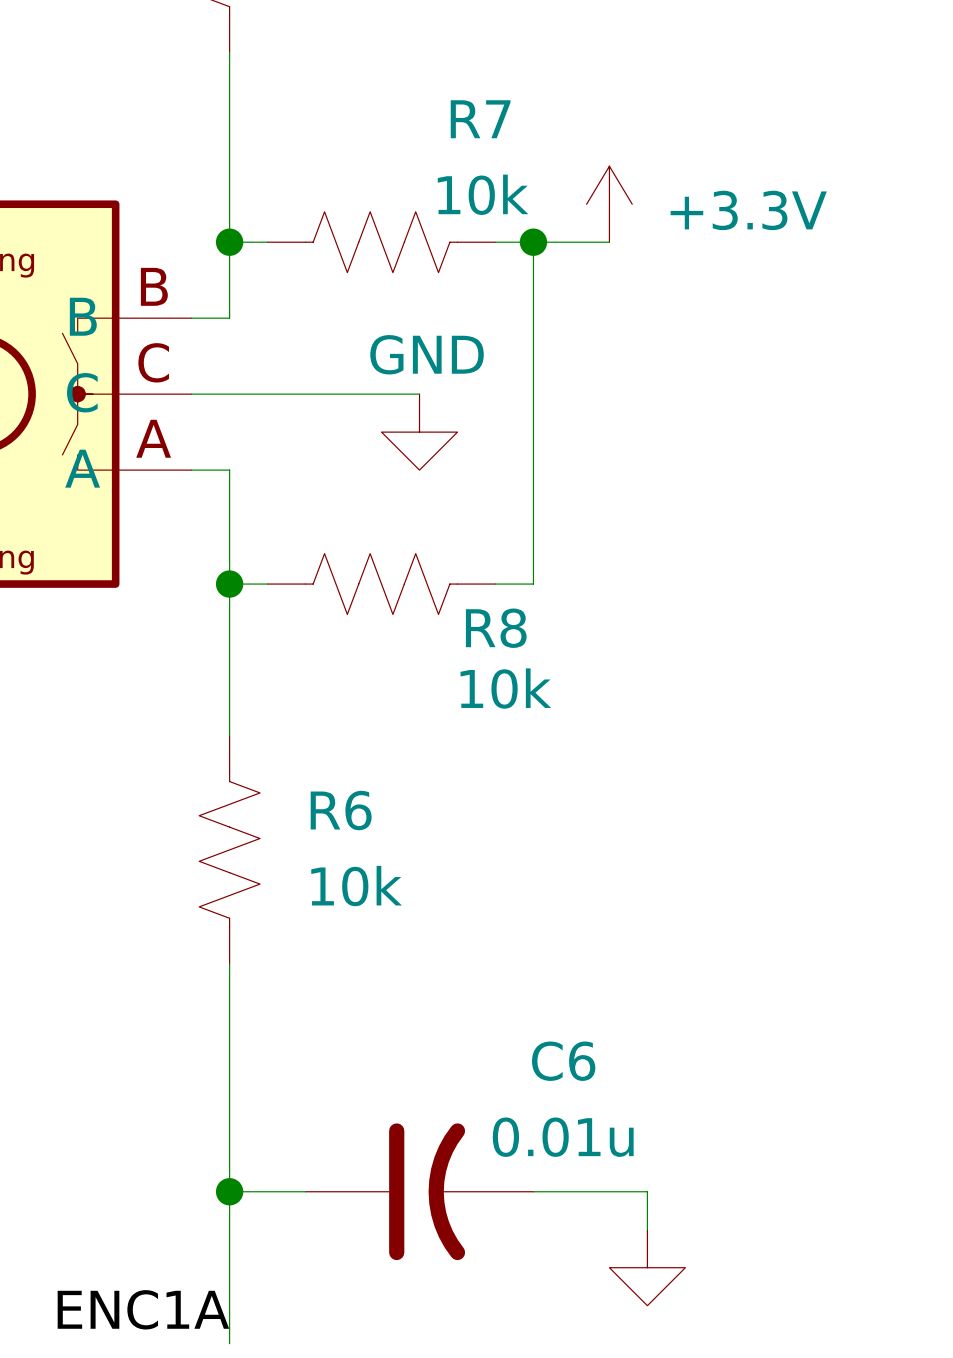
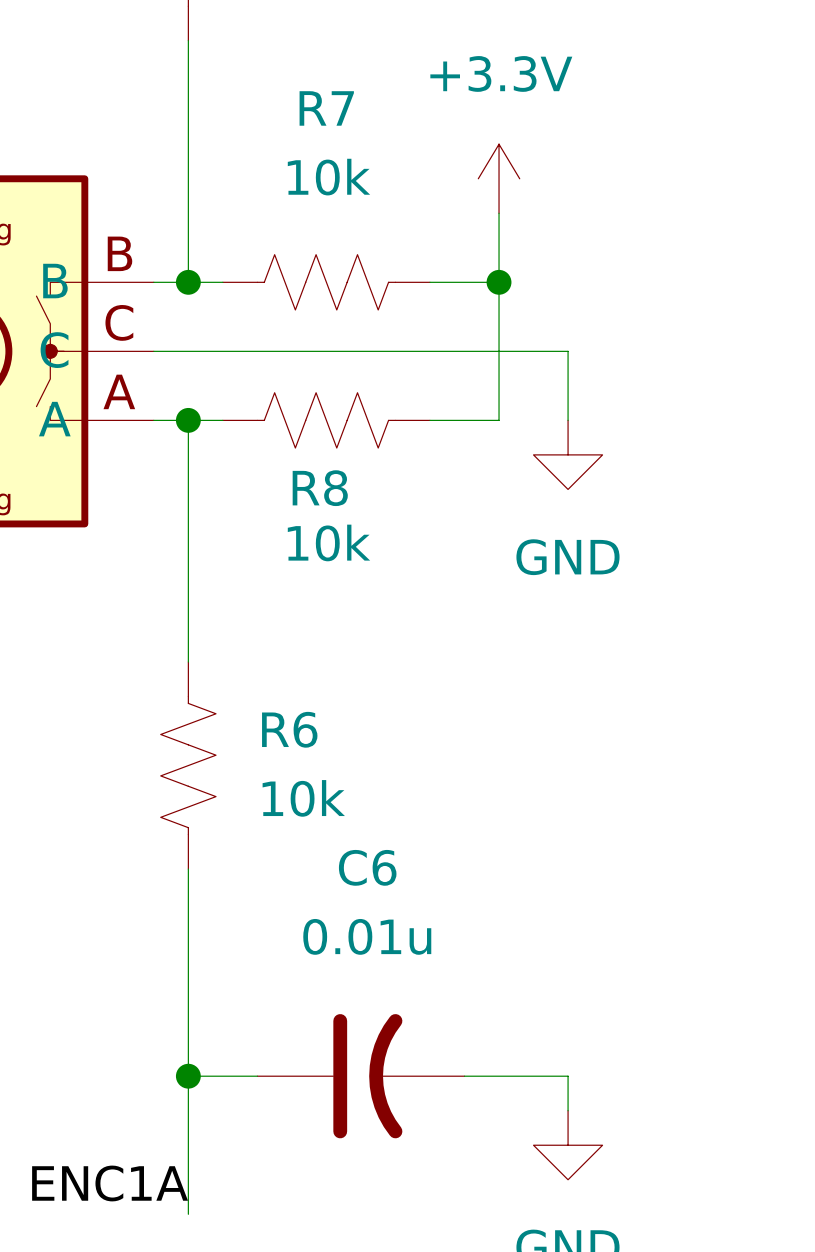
R7 name position: R7 (480, 119) -> R7 (326, 108)
R7 value position: 10k (483, 194) -> 10k (328, 177)
power symbol position: +3.3V (609, 204) -> +3.3V (499, 178)
power symbol text position: +3.3V (748, 210) -> +3.3V (501, 73)
wire: (229, 242) (267, 242) -> (188, 282) (222, 282)
junction position: (229, 242) -> (188, 282)
R7 position: (381, 242) -> (326, 282)
wire: (495, 242) (609, 242) -> none
wire: (533, 242) (533, 584) (495, 584) -> none
junction position: (533, 242) -> (499, 282)
wire: none -> (499, 213) (499, 420) (429, 420)
wire: none -> (429, 282) (499, 282)
power symbol text position: GND (427, 354) -> GND (567, 557)
wire: none -> (360, 351) (568, 351) (568, 420)
power symbol position: GND (419, 432) -> GND (568, 454)
junction: none -> (188, 420)
wire: (229, 584) (267, 584) -> (188, 420) (222, 420)
junction: (229, 584) -> none
R8 position: (381, 584) -> (326, 420)
R8 name position: R8 (496, 628) -> R8 (320, 488)
R8 value position: 10k (505, 688) -> 10k (328, 542)
C6 name position: C6 (563, 1061) -> C6 (367, 867)
C6 value position: 0.01u (563, 1137) -> 0.01u (367, 936)

